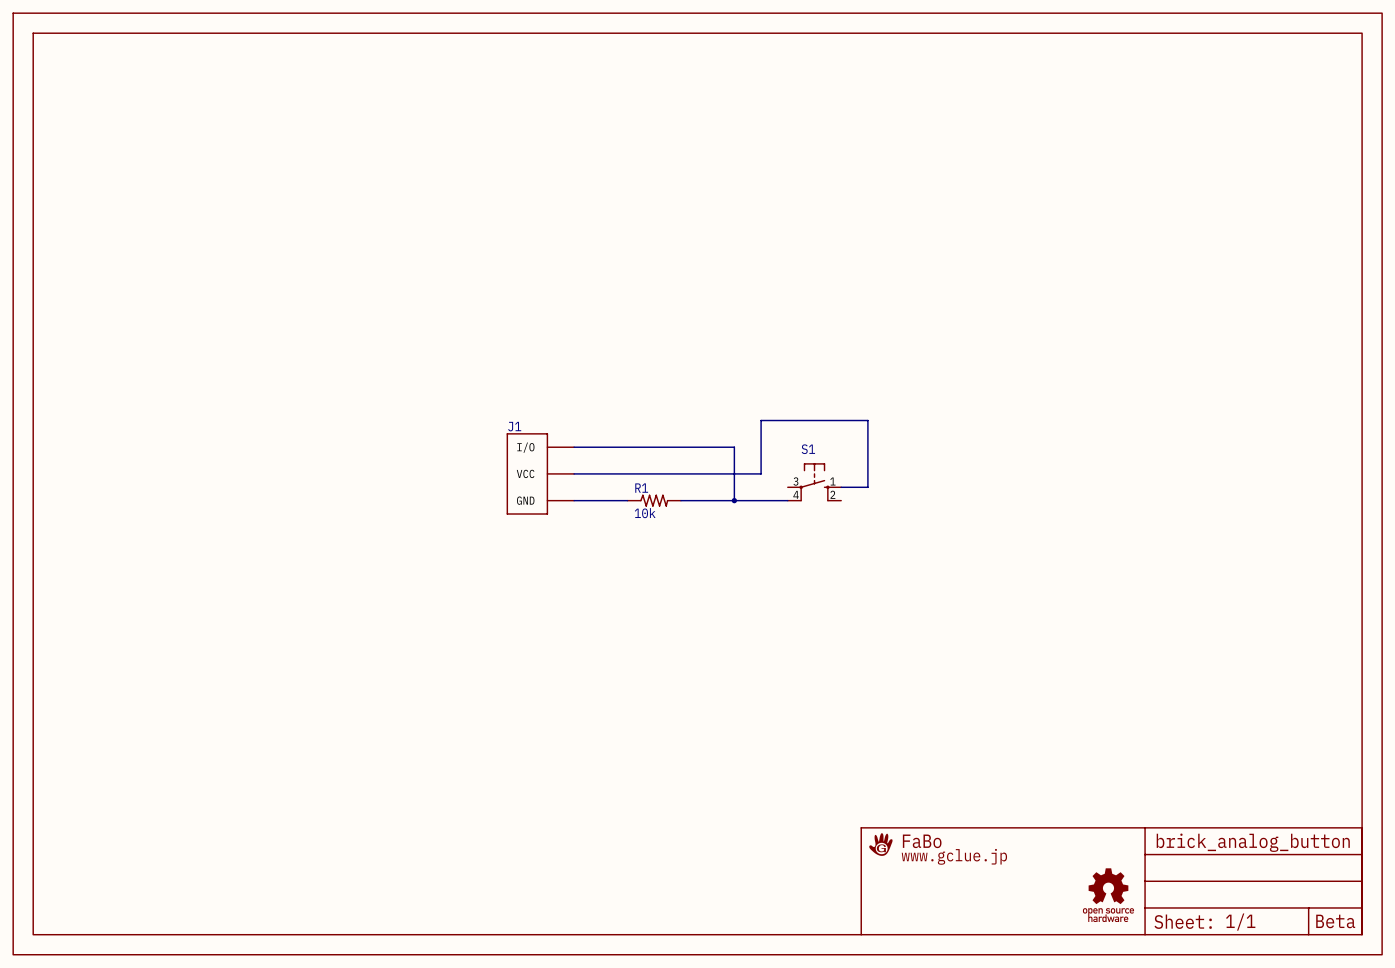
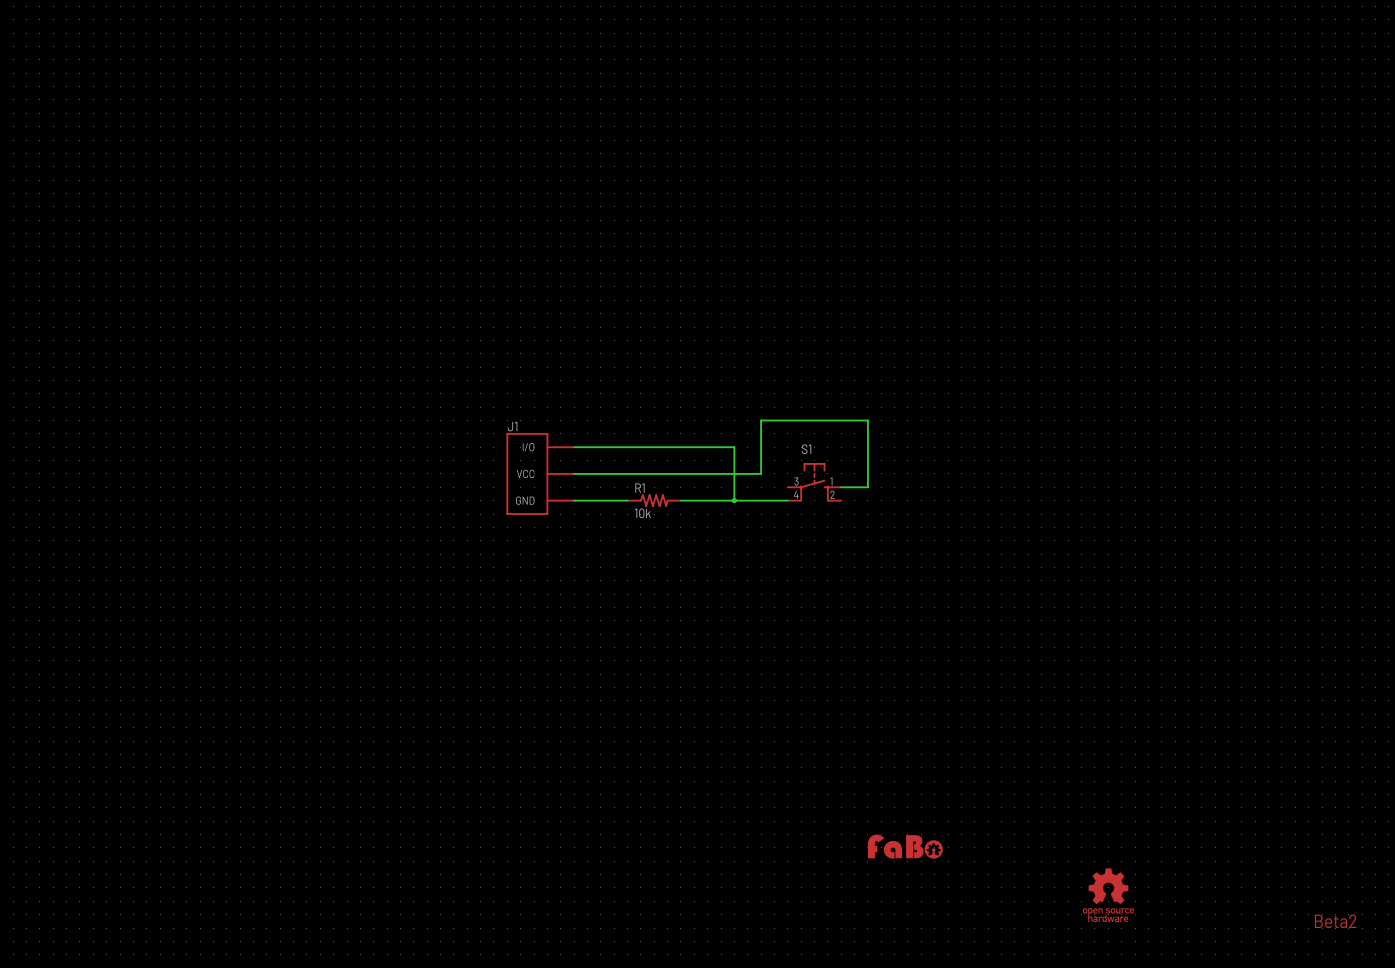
part: (697, 483) -> none
part: none -> (905, 846)
text: Beta (1335, 921) -> Beta2 (1335, 921)

